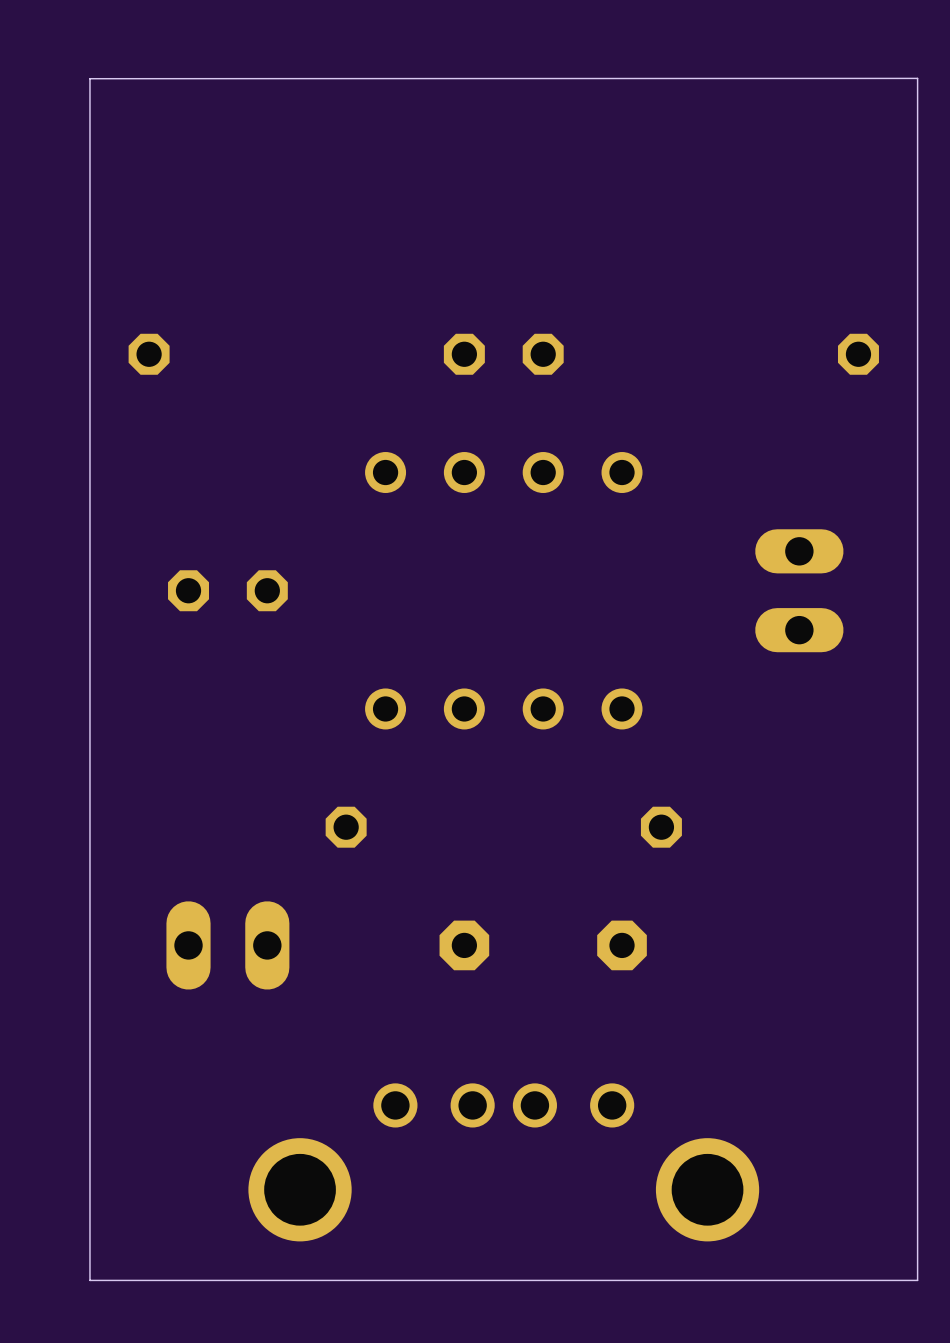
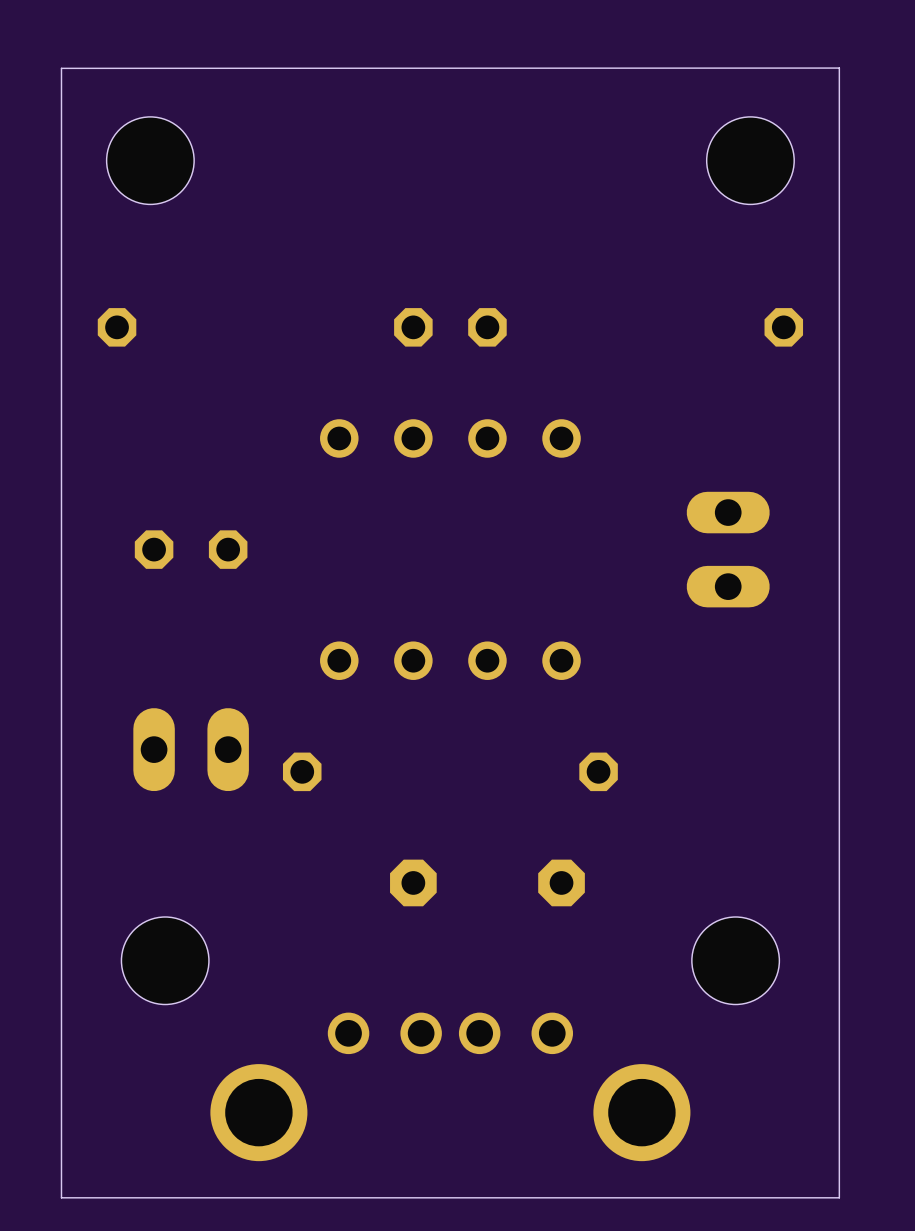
hole: none -> (150, 160)
hole: none -> (750, 160)
part position: (227, 945) -> (191, 749)
hole: none -> (165, 960)
hole: none -> (735, 960)

